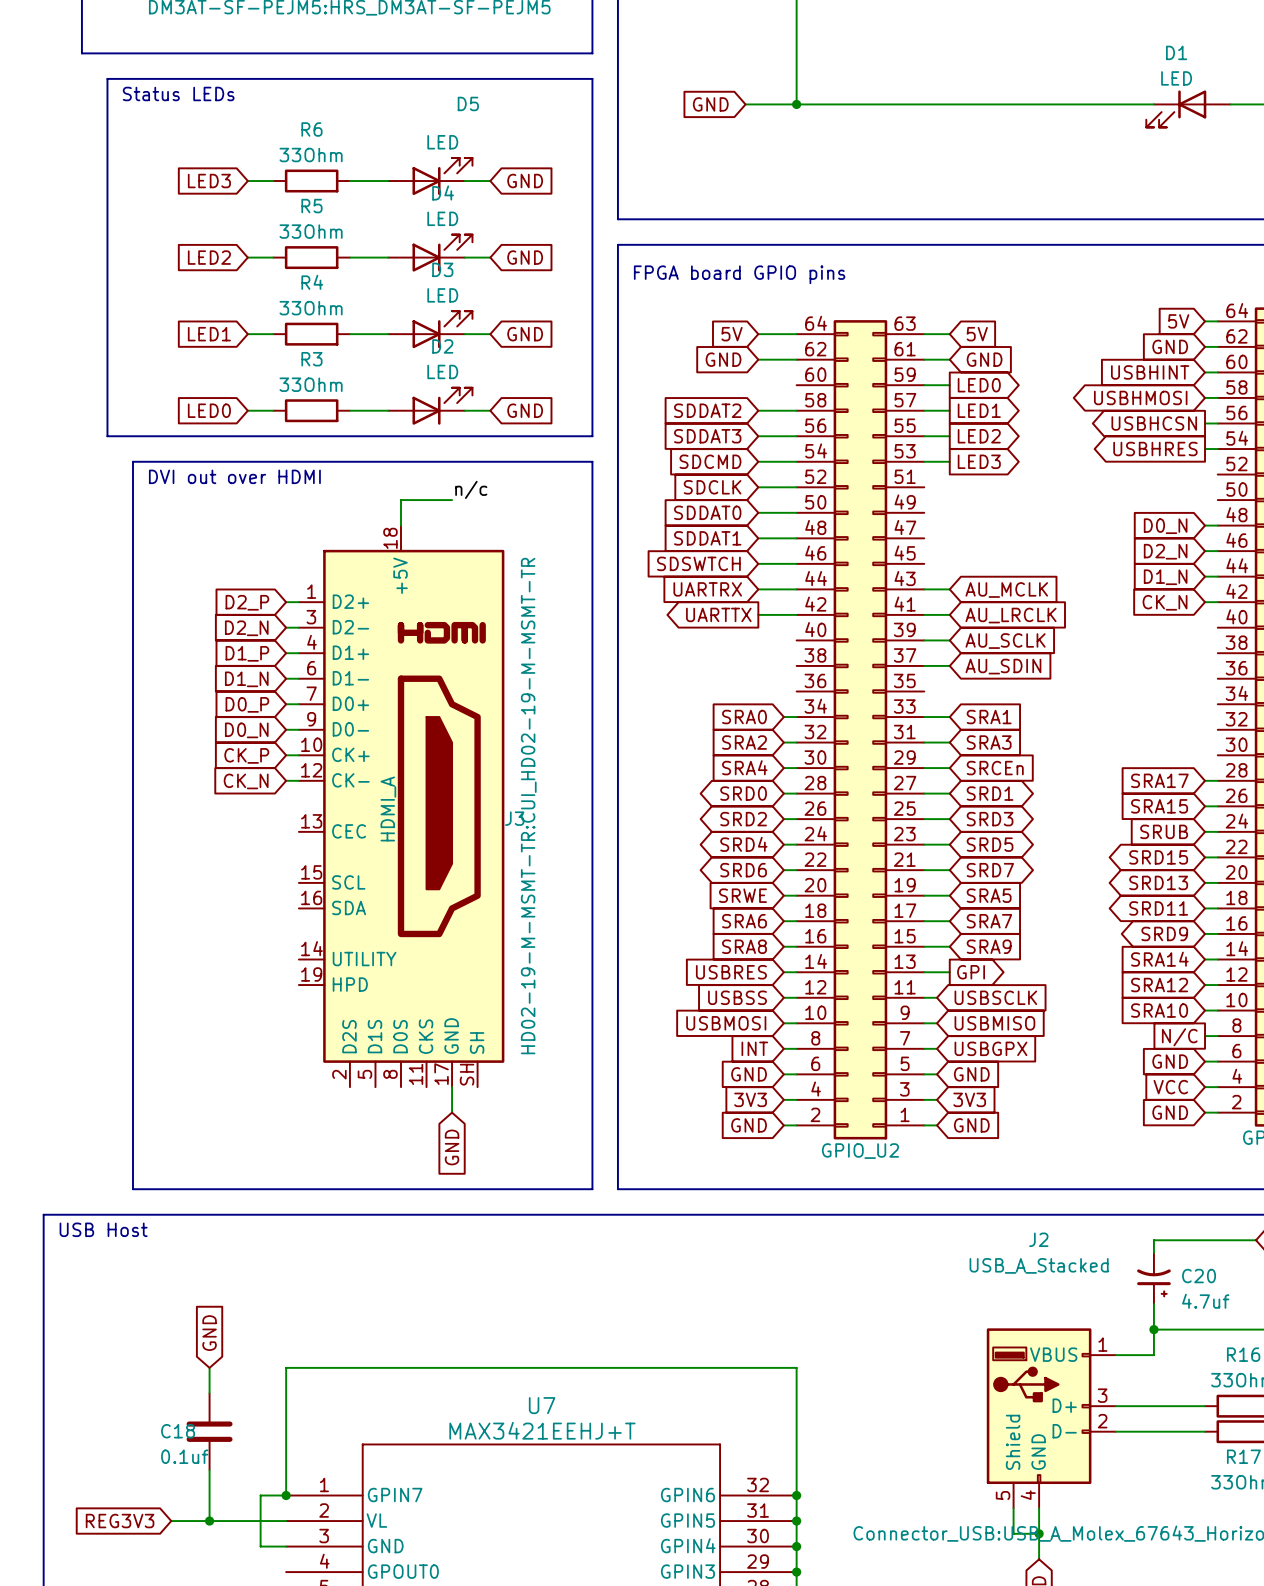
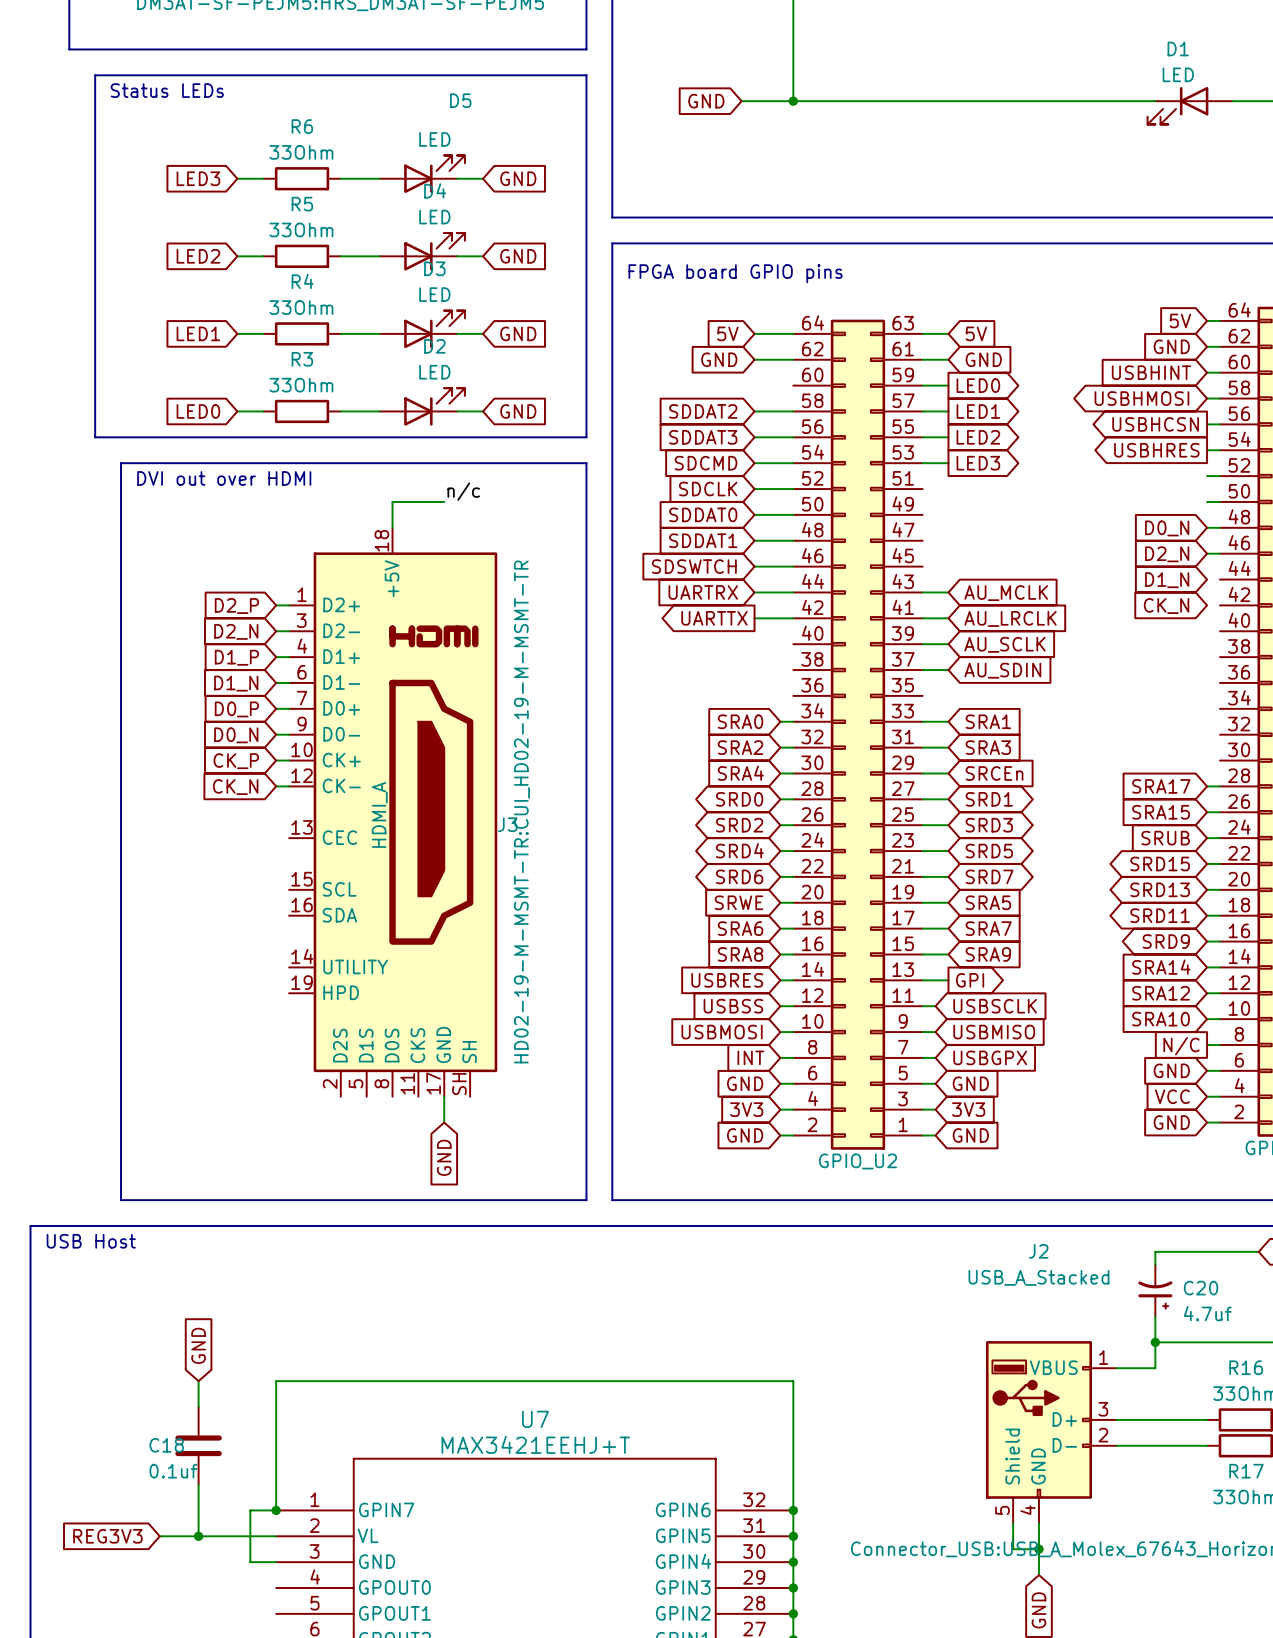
wire: (1205, 576) (1217, 576) -> (1207, 476) (1219, 476)
wire: (1205, 602) (1217, 602) -> (1207, 501) (1219, 501)

